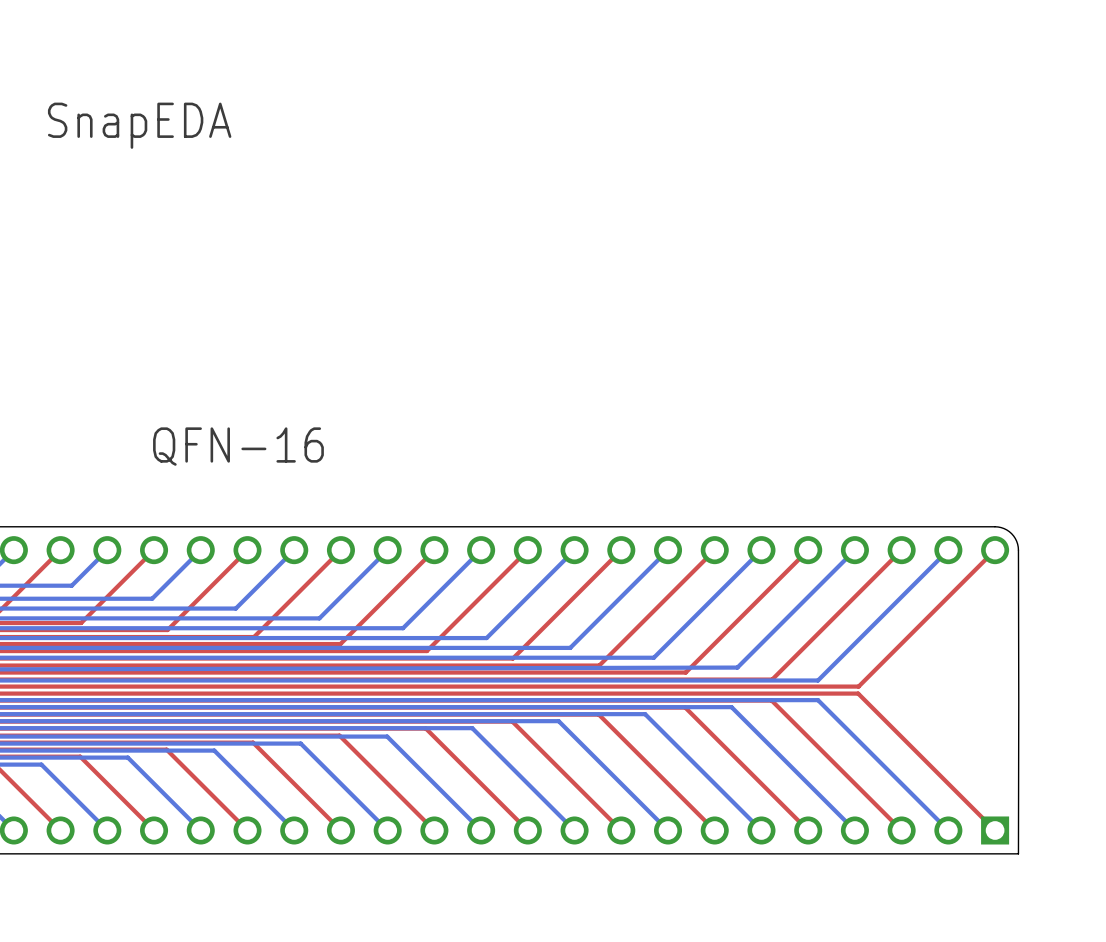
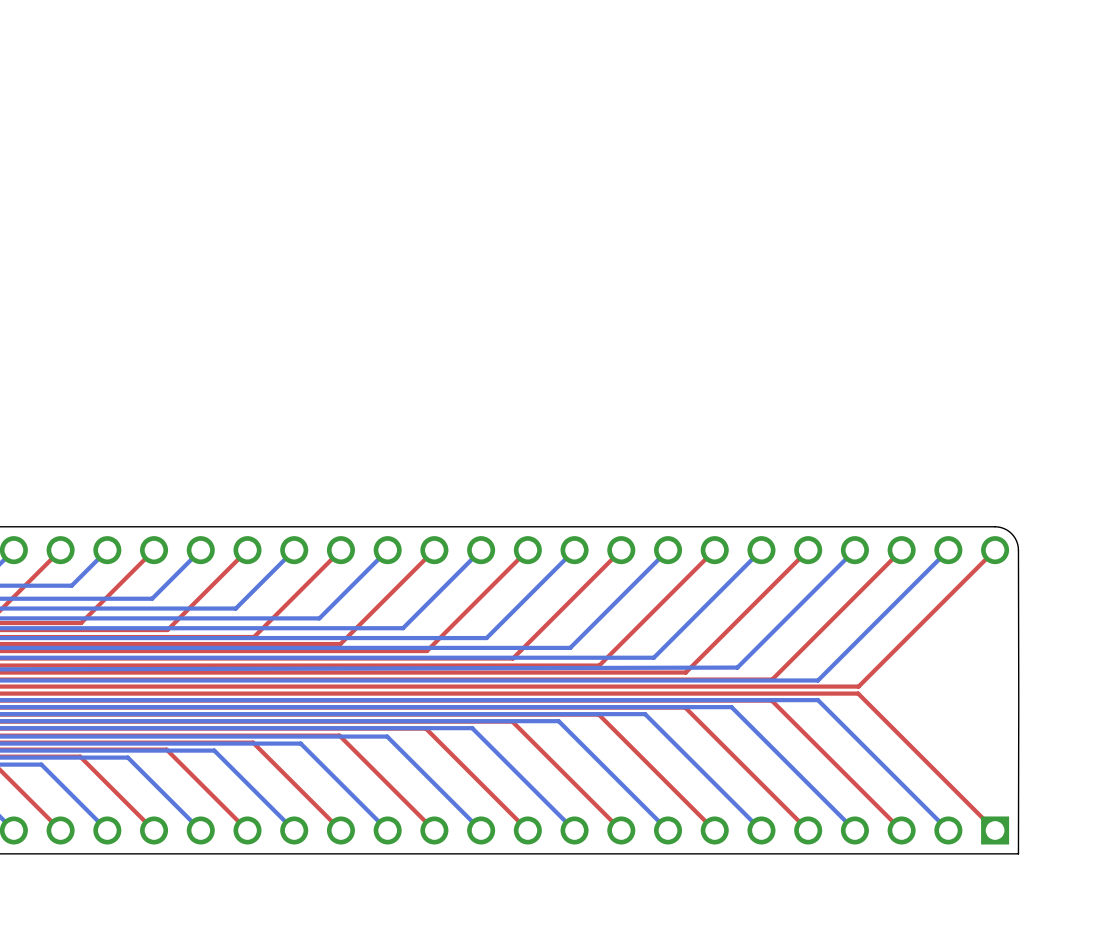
text: SnapEDA (139, 125) -> none
text: QFN-16 (238, 446) -> none

